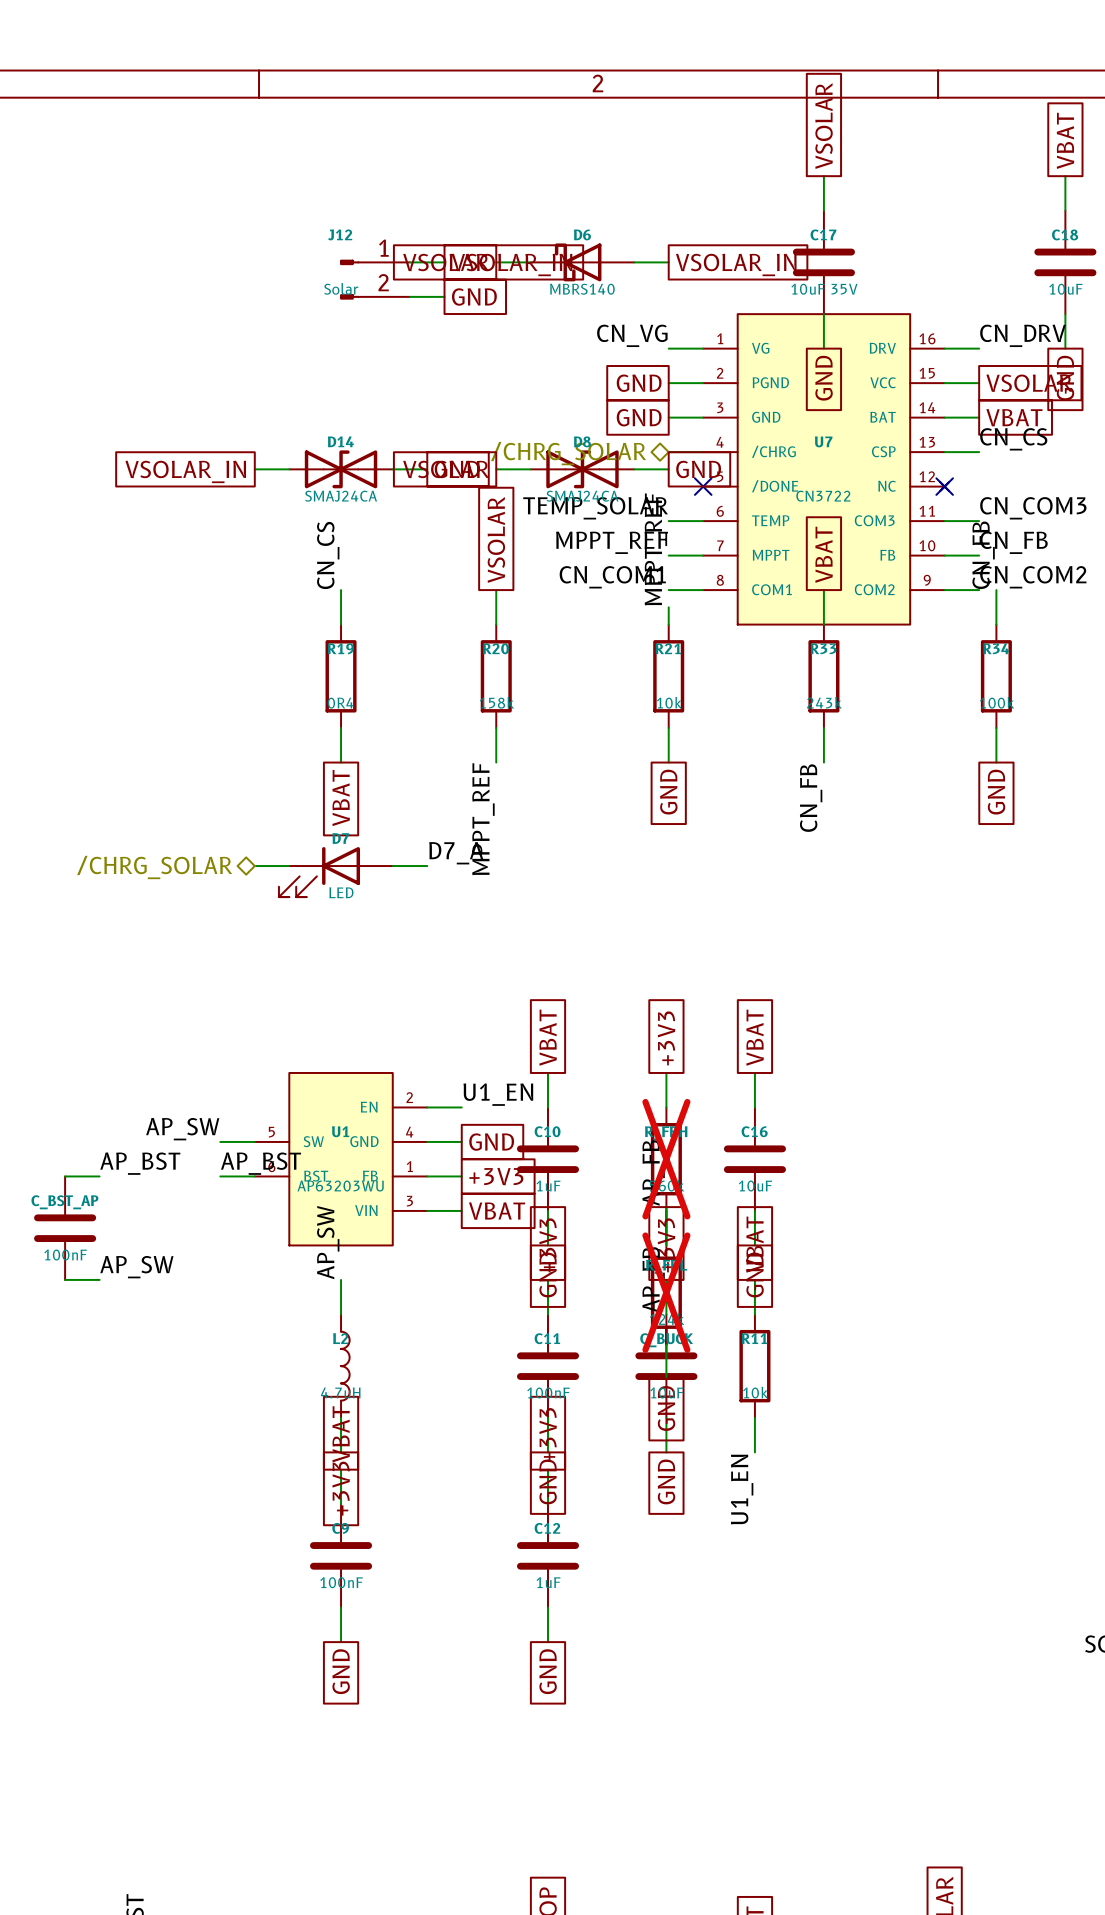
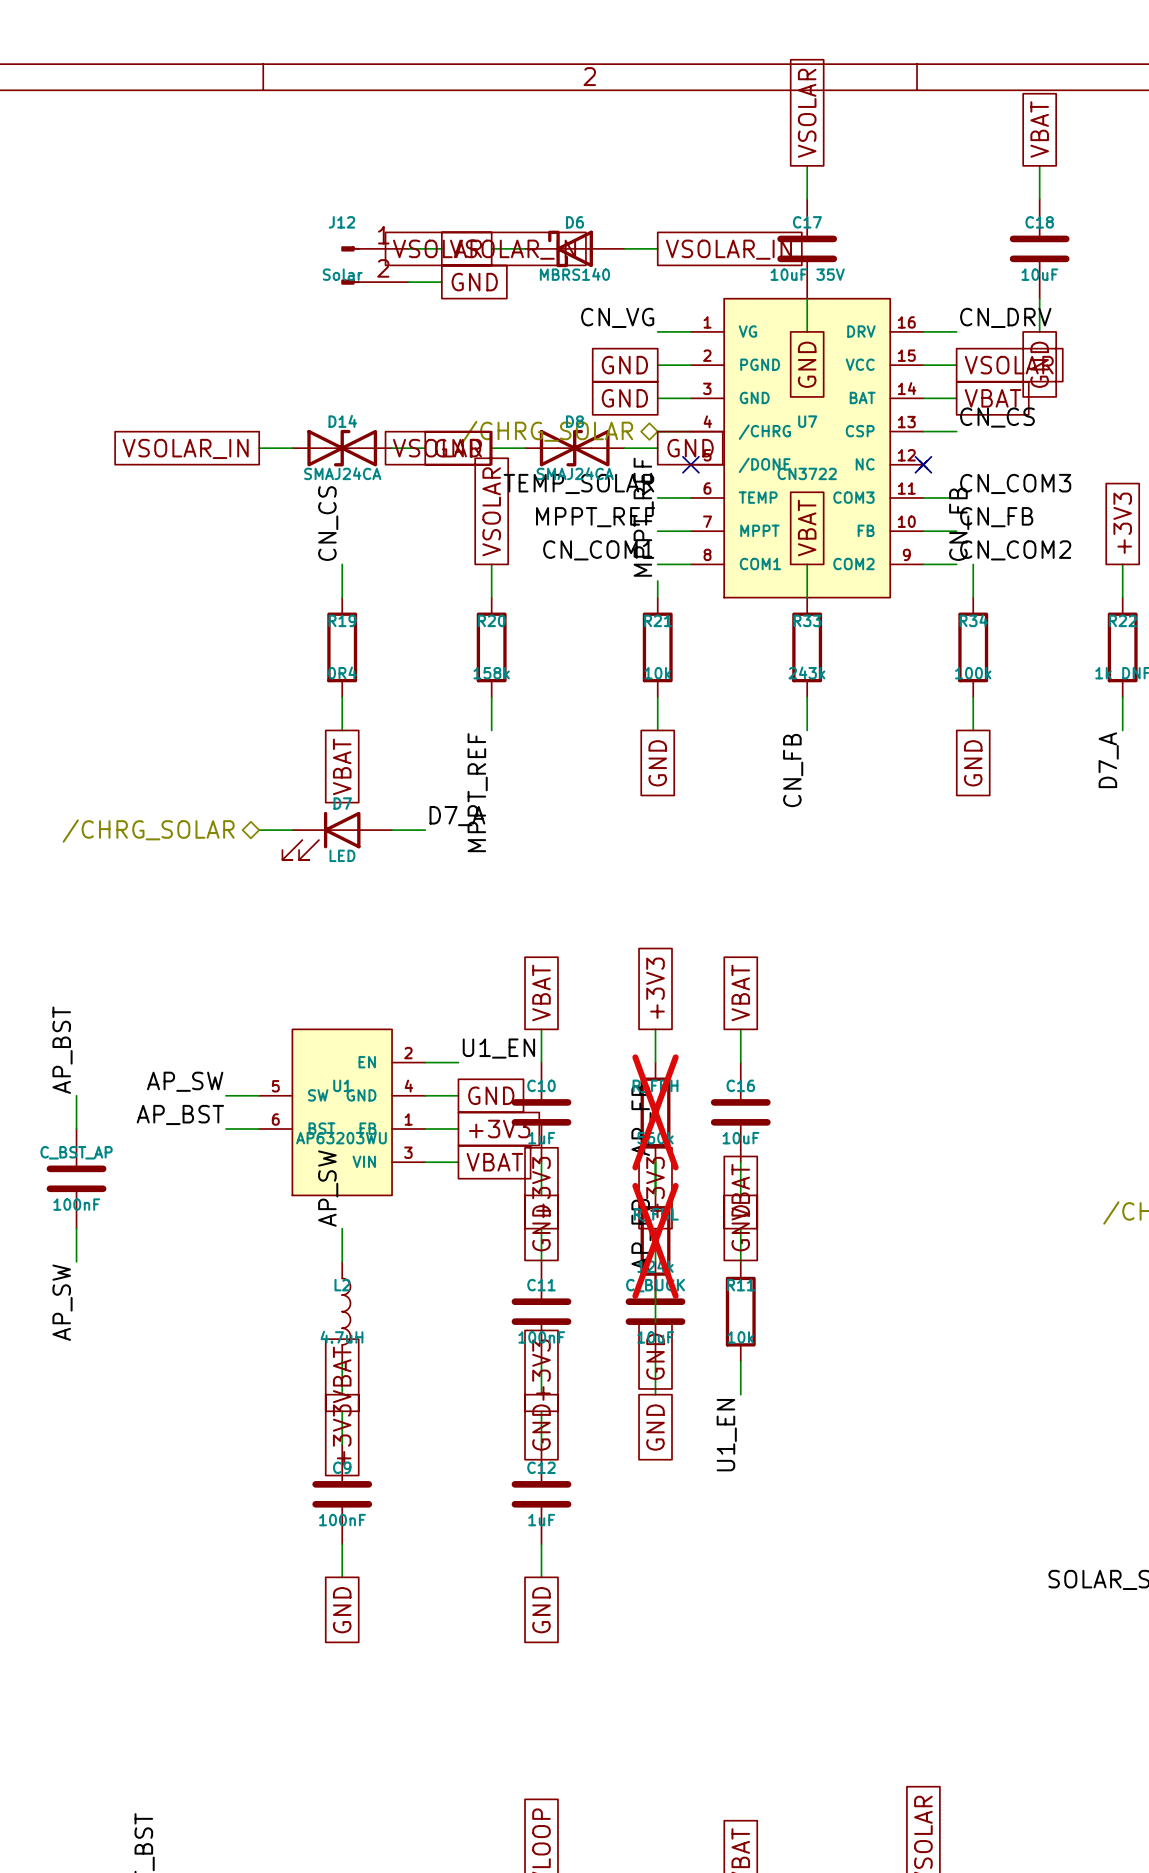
label rotation: 0° (140, 1163) -> 90° counterclockwise (62, 1050)
label position: AP_BST (140, 1163) -> AP_BST (62, 1050)
label position: AP_BST (261, 1163) -> AP_BST (180, 1114)
wire: (65, 1176) (99, 1176) -> (76, 1128) (76, 1095)
label rotation: 0° (136, 1267) -> 90° counterclockwise (62, 1302)
label position: AP_SW (136, 1267) -> AP_SW (62, 1302)
wire: (65, 1279) (99, 1279) -> (76, 1228) (76, 1261)

